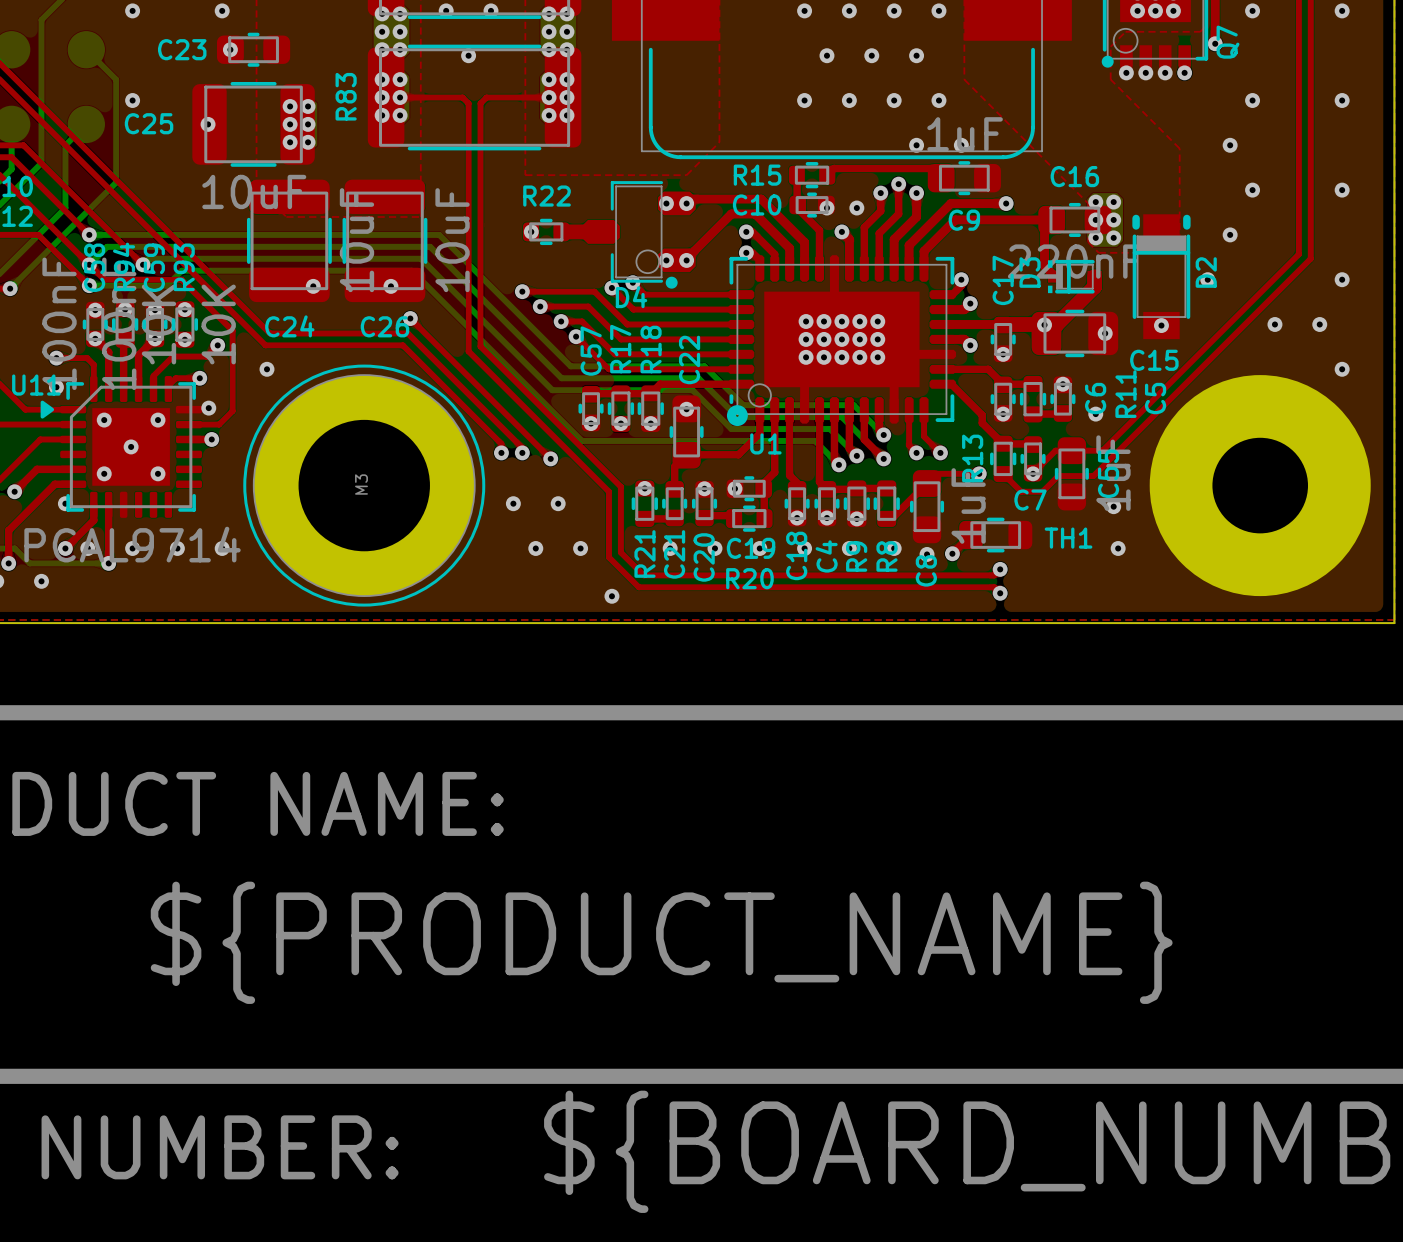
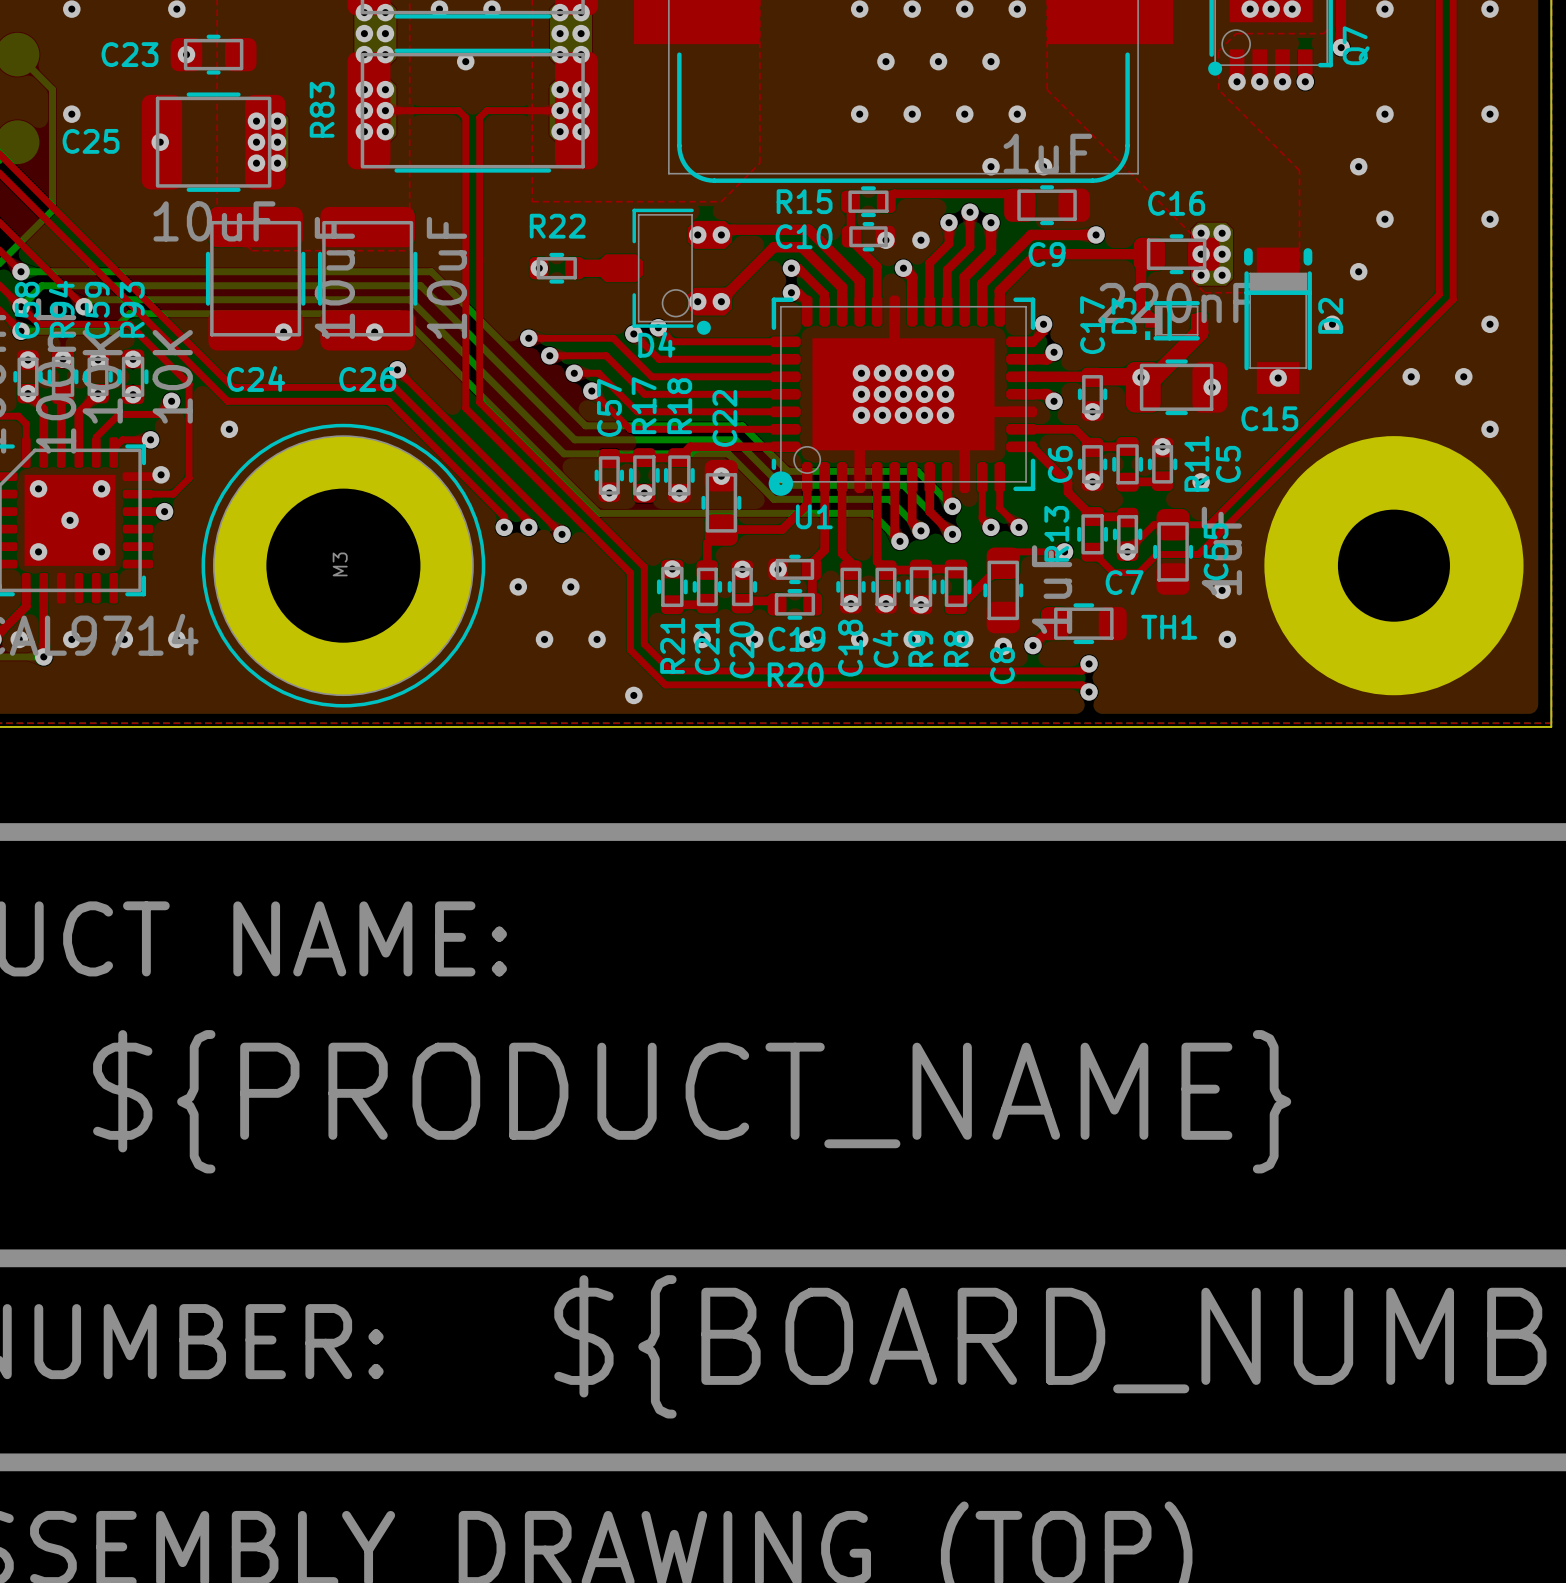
R11 name position: R11 (1125, 394) -> R11 (1196, 463)
C6 name position: C6 (1095, 398) -> C6 (1060, 464)
C5 name position: C5 (1155, 398) -> C5 (1228, 464)

